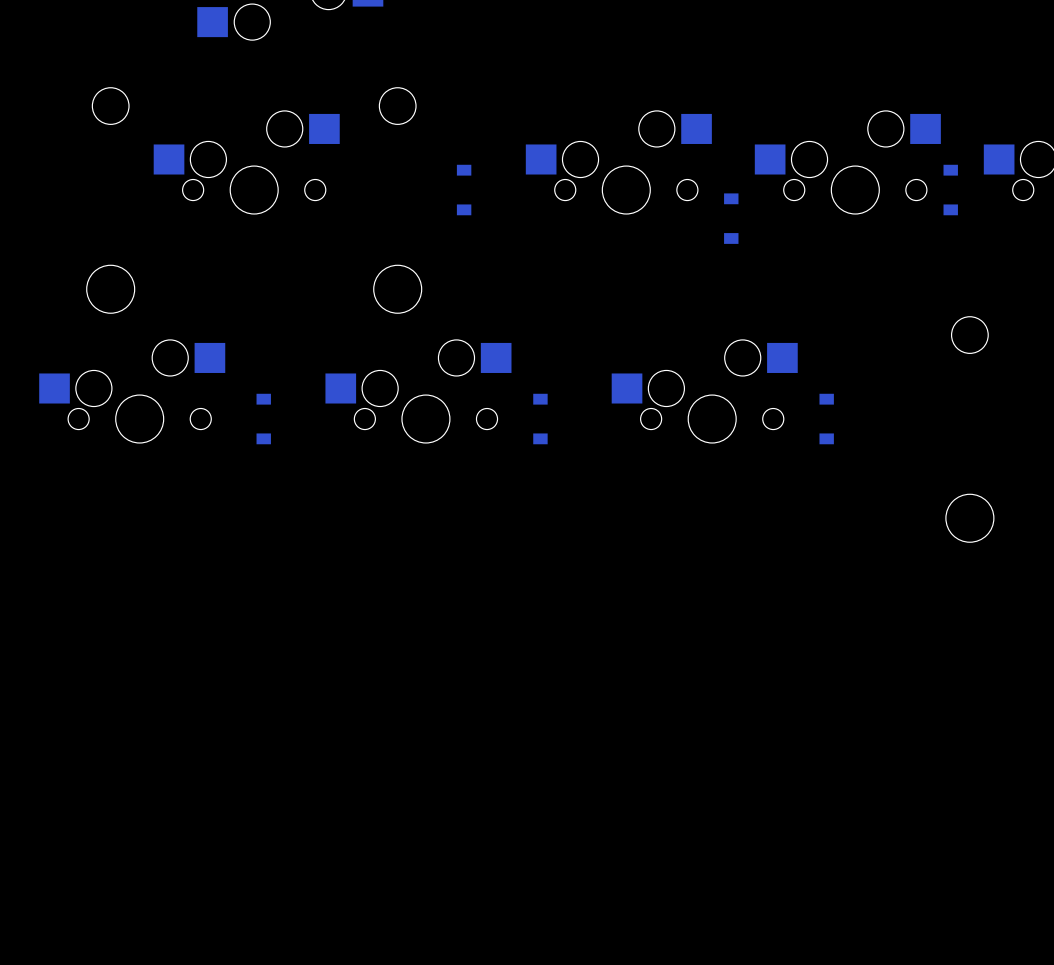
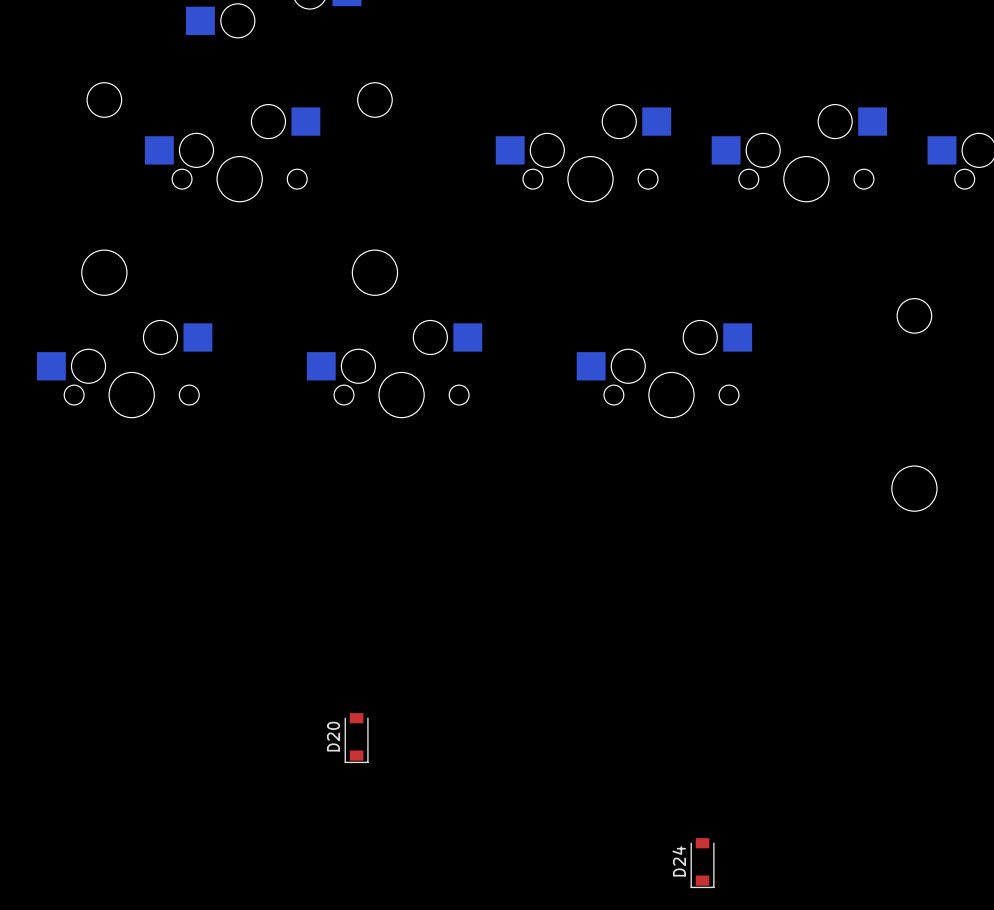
part: (464, 190) -> none
part: (950, 190) -> none
part: (731, 218) -> none
part: (263, 419) -> none
part: (540, 419) -> none
part: (826, 419) -> none
D20: none -> (356, 738)
D24: none -> (702, 863)

